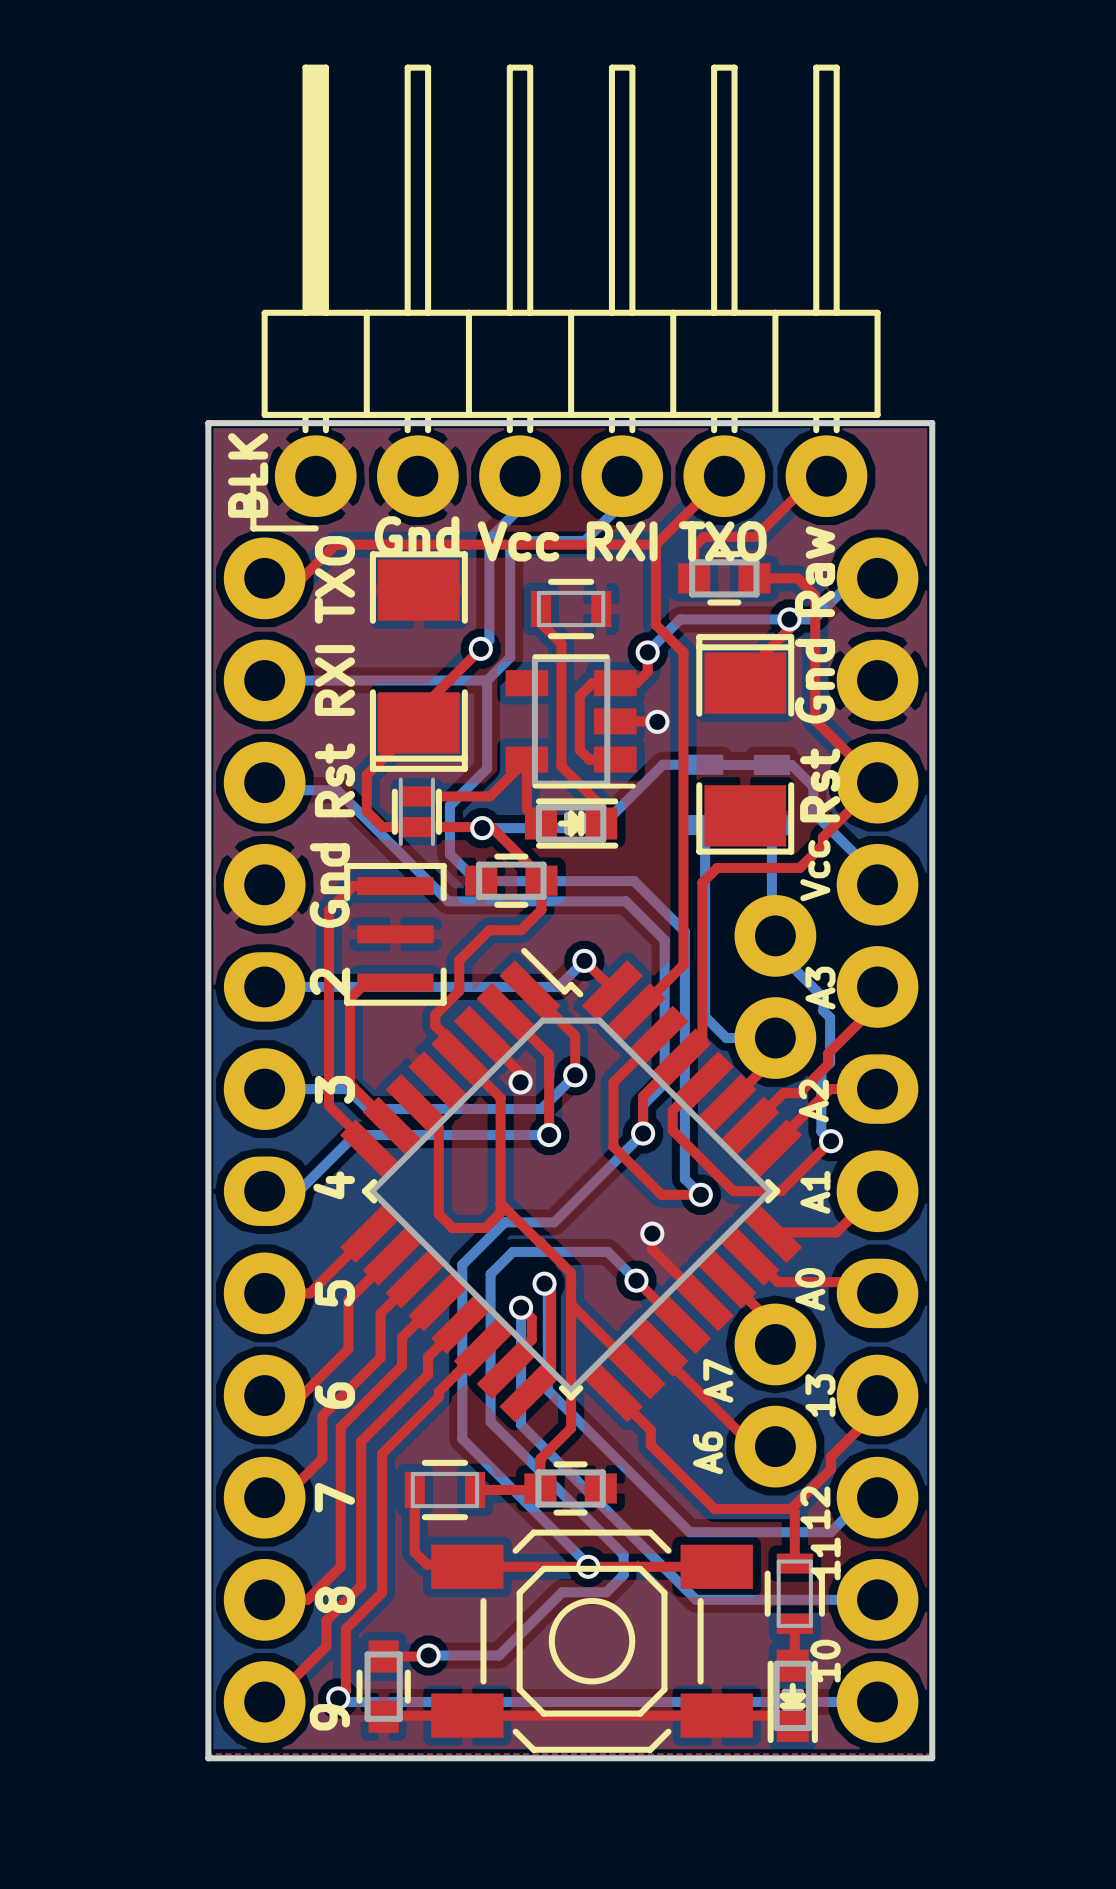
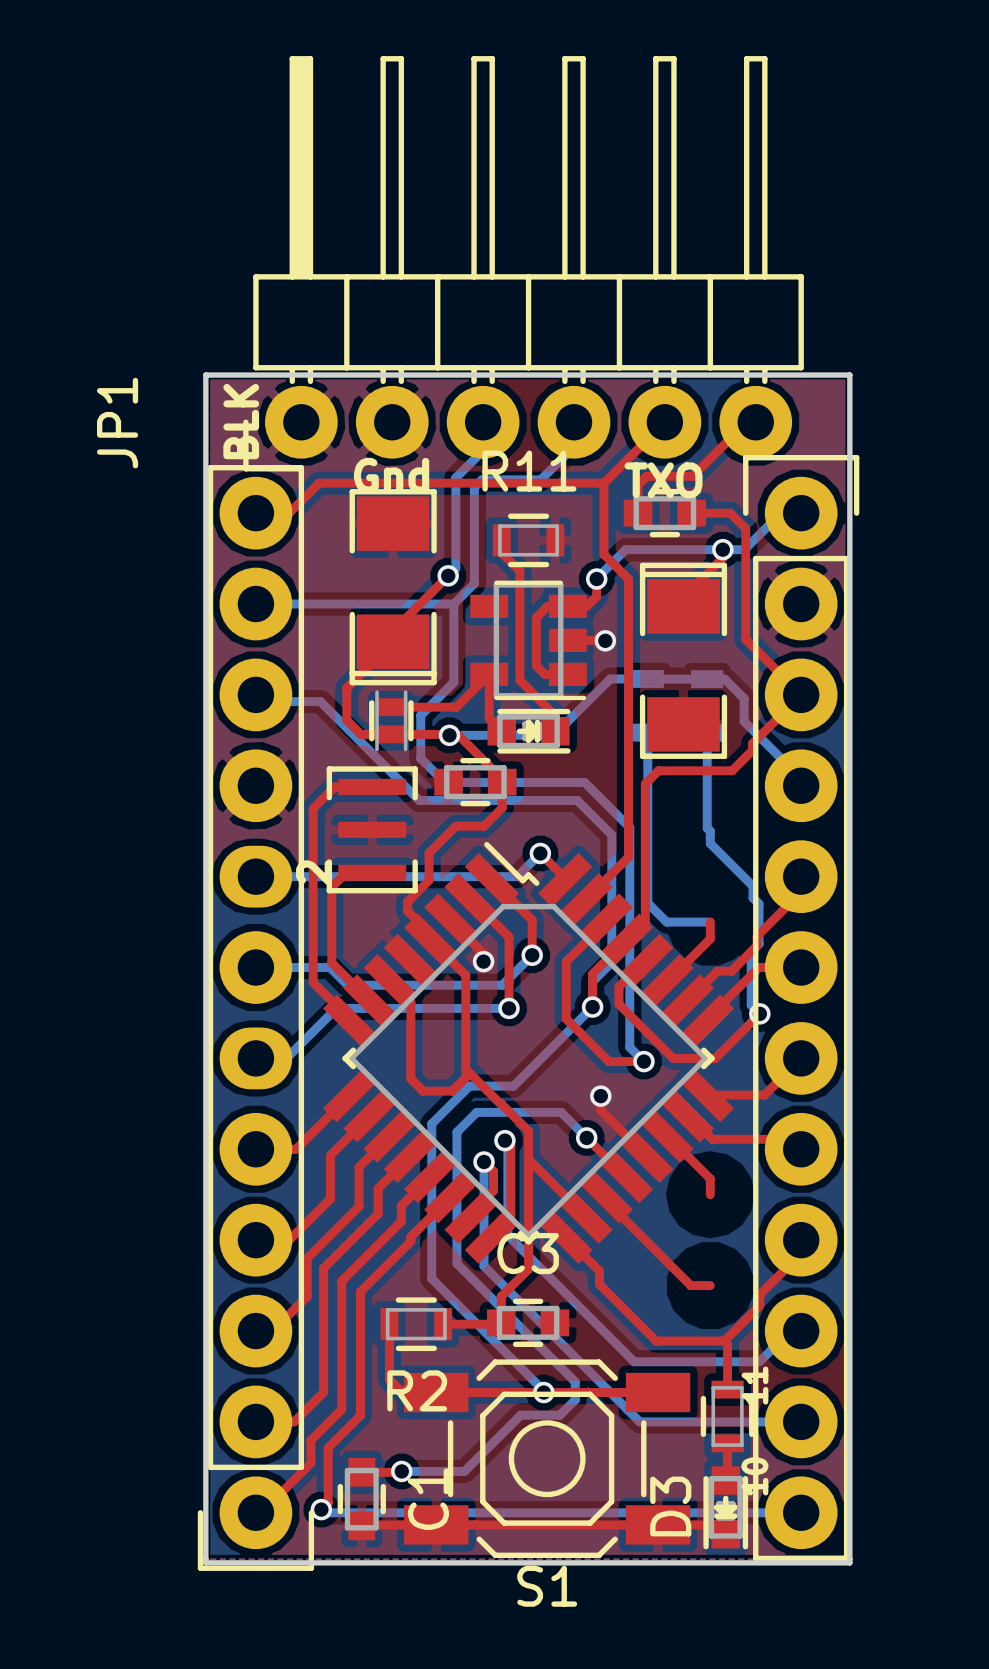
JP1 name: none -> JP1 (117, 423)
R11 name: none -> R11 (529, 471)
part footprint: [223, 537, 306, 1743] -> [197, 465, 315, 1571]
part footprint: [836, 537, 919, 1743] -> [743, 455, 860, 1561]
text: Vcc (518, 541) -> none
text: RXI (622, 541) -> none
text: Raw (815, 571) -> none
text: TXO (334, 579) -> none
text: RXI (334, 680) -> none
text: Gnd (815, 681) -> none
text: Rst (334, 780) -> none
text: Rst (820, 785) -> none
text: Vcc (815, 870) -> none
text: Gnd (329, 885) -> none
part: (775, 986) -> none
text: A3 (820, 988) -> none
text: 3 (334, 1089) -> none
text: A2 (813, 1100) -> none
text: 4 (334, 1185) -> none
text: A1 (815, 1192) -> none
text: A0 (810, 1289) -> none
text: 5 (334, 1293) -> none
text: A7 (718, 1380) -> none
text: 6 (334, 1395) -> none
part: (775, 1395) -> none
text: 13 (820, 1395) -> none
C3 name: none -> C3 (528, 1253)
text: A6 (708, 1452) -> none
text: 7 (334, 1497) -> none
text: 12 (815, 1507) -> none
R2 name: none -> R2 (417, 1390)
text: 8 (334, 1599) -> none
C1 name: none -> C1 (428, 1499)
D3 name: none -> D3 (670, 1506)
text: 9 (329, 1717) -> none
S1 name: none -> S1 (547, 1586)

